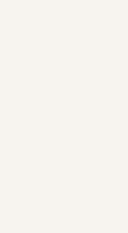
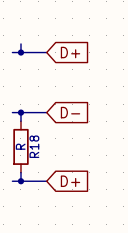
wire: none -> (20, 43) (20, 52)
wire: none -> (12, 52) (46, 52)
junction: none -> (20, 52)
global label: none -> D+ (70, 52)
wire: none -> (12, 112) (46, 112)
wire: none -> (20, 112) (20, 121)
junction: none -> (20, 112)
global label: none -> D- (70, 112)
R18: none -> R (20, 146)
wire: none -> (20, 172) (20, 181)
wire: none -> (12, 181) (46, 181)
junction: none -> (20, 181)
global label: none -> D+ (70, 181)

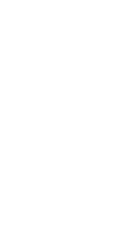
wire: (20, 43) (20, 52) -> none
wire: (12, 52) (46, 52) -> none
junction: (20, 52) -> none
global label: D+ (70, 52) -> none
wire: (12, 112) (46, 112) -> none
wire: (20, 112) (20, 121) -> none
junction: (20, 112) -> none
global label: D- (70, 112) -> none
R18: R (20, 146) -> none
wire: (20, 172) (20, 181) -> none
wire: (12, 181) (46, 181) -> none
junction: (20, 181) -> none
global label: D+ (70, 181) -> none

